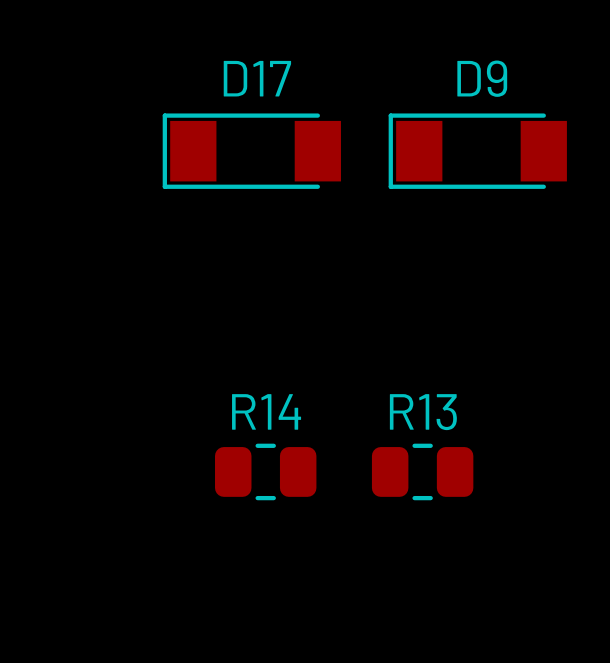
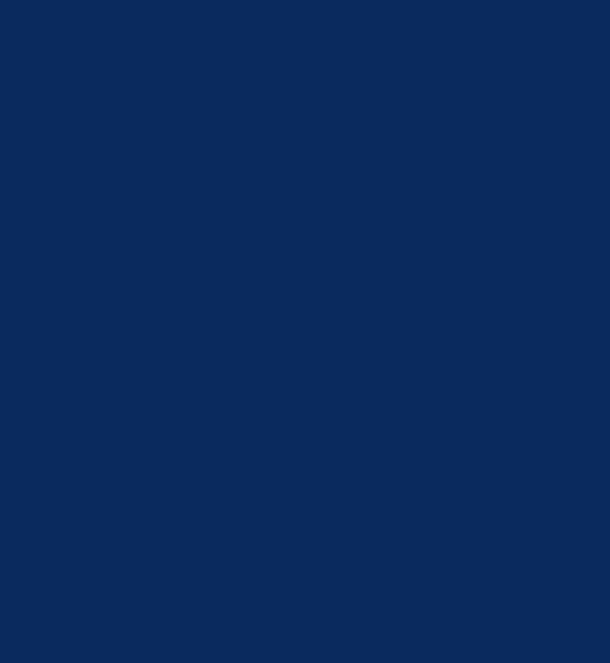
D17: (251, 151) -> none
D9: (477, 151) -> none
R14: (265, 471) -> none
R13: (422, 471) -> none

